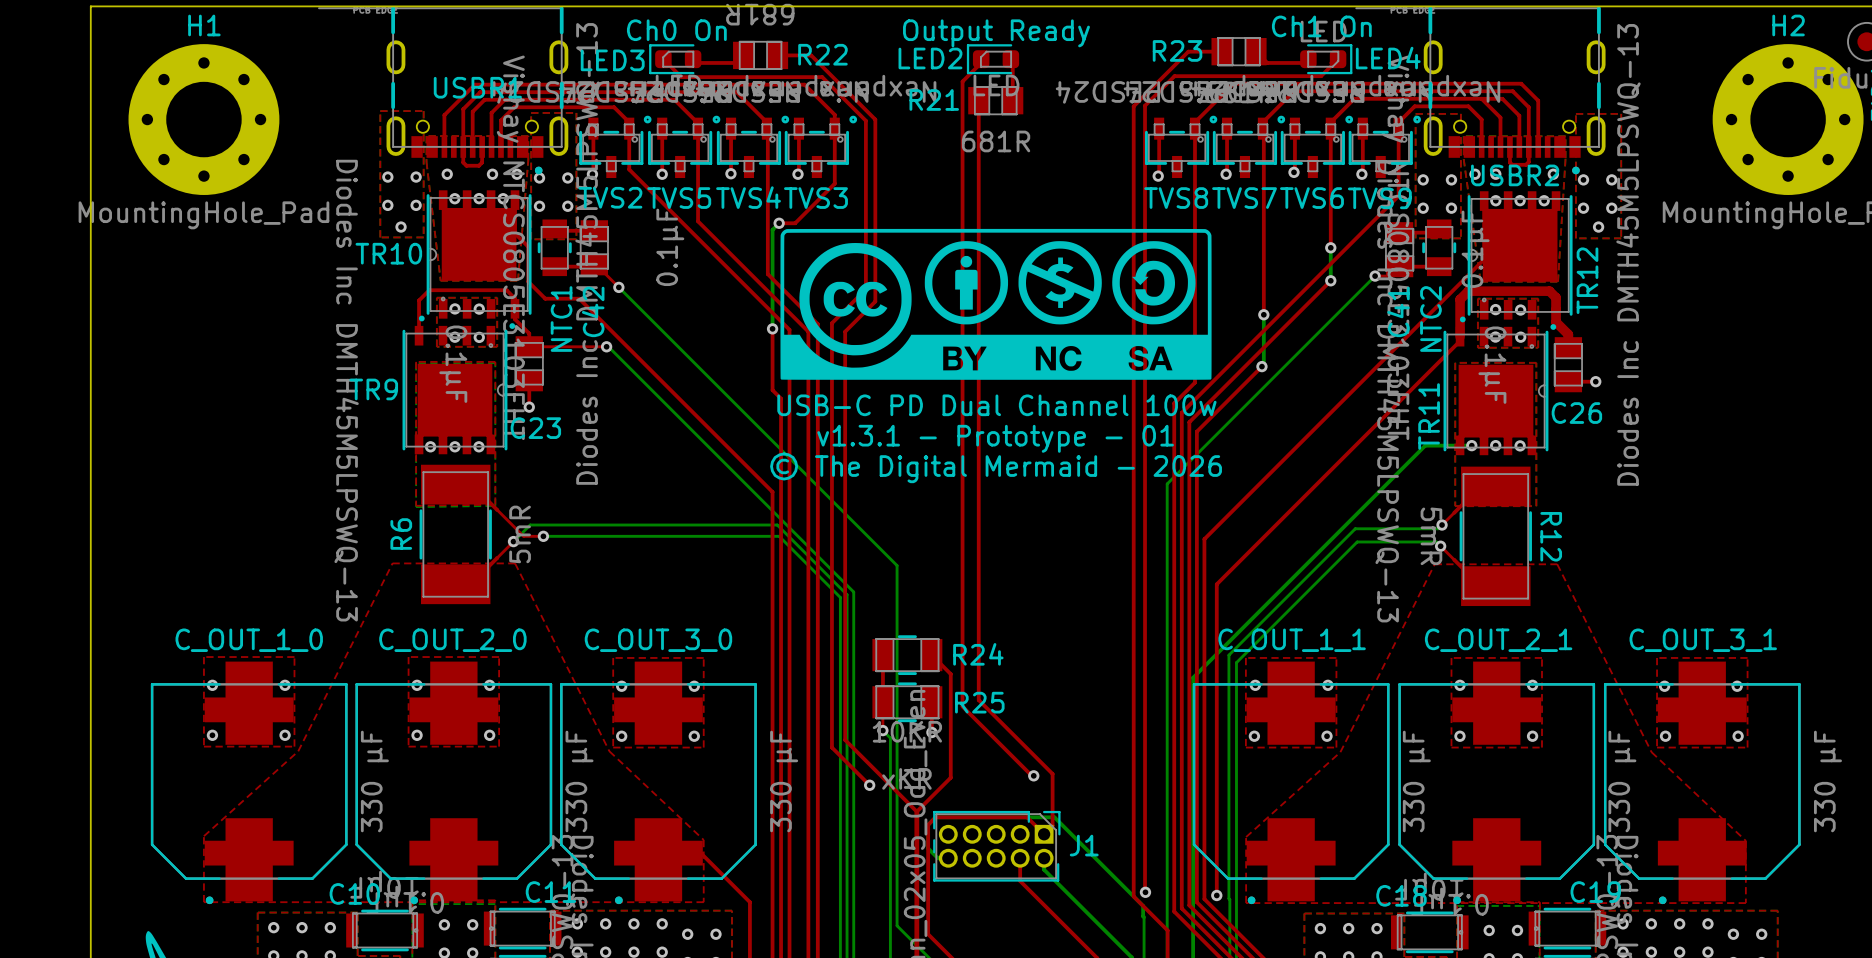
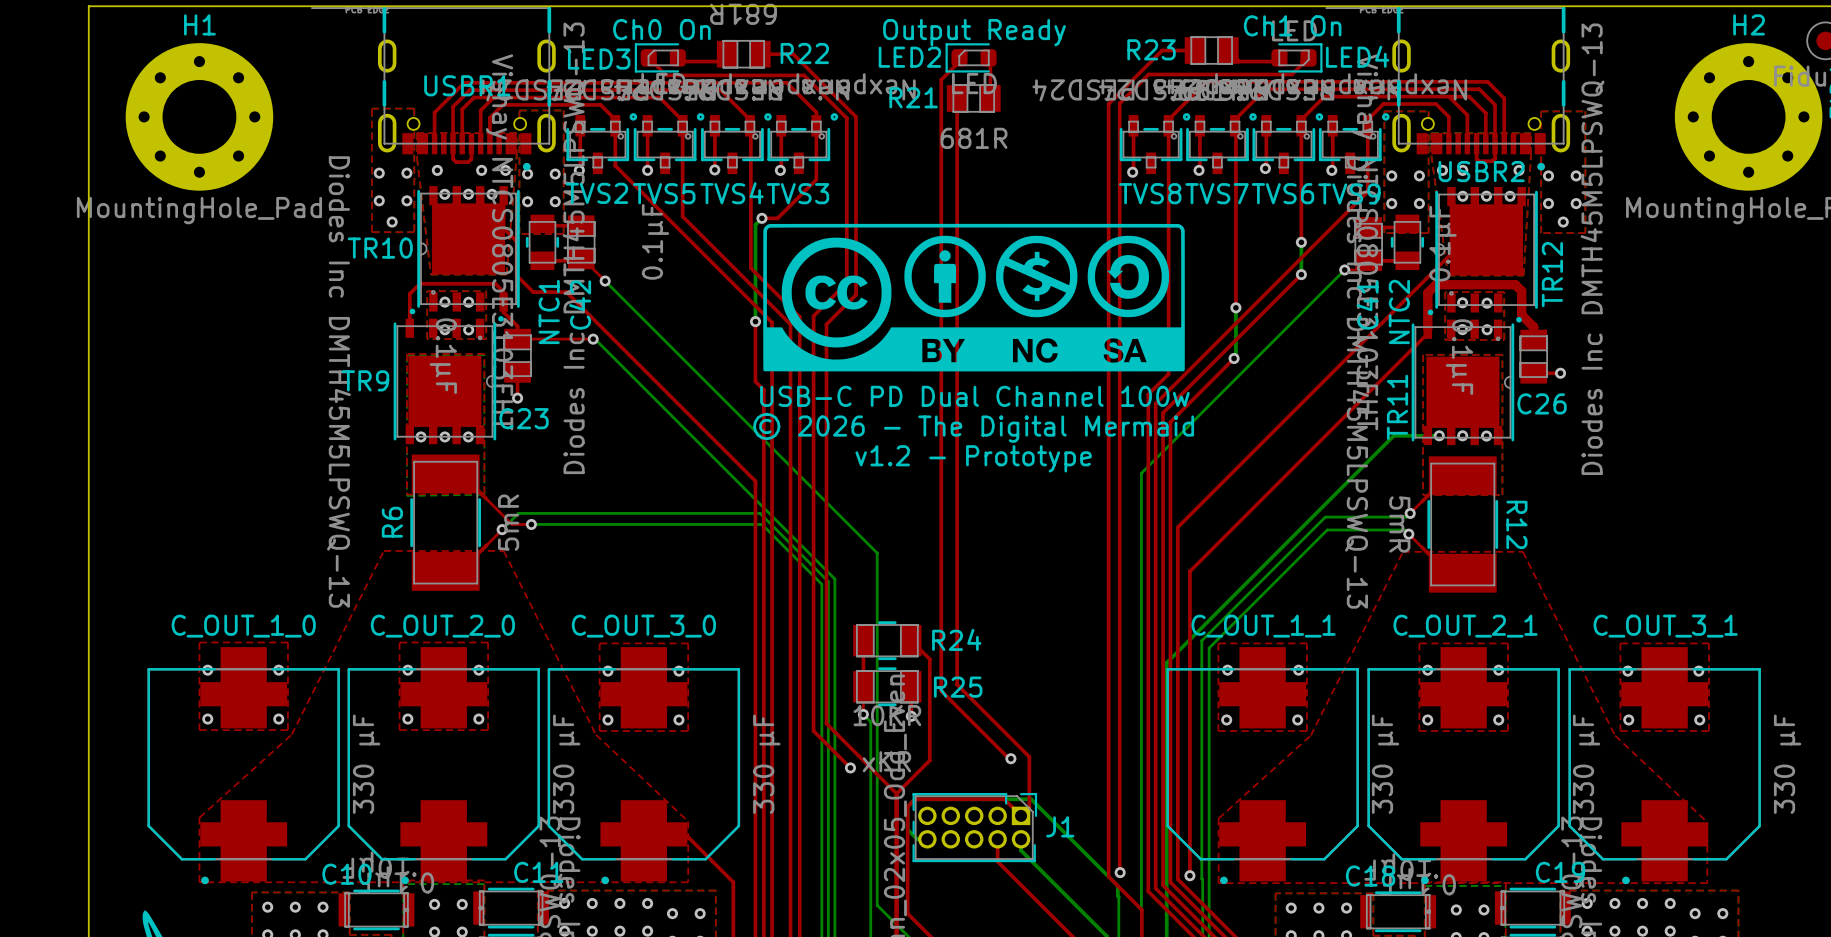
text: v1.3.1 - Prototype - 01 (995, 438) -> © 2026 - The Digital Mermaid (973, 427)
text: © The Digital Mermaid - 2026 (996, 467) -> v1.2 - Prototype (973, 458)

